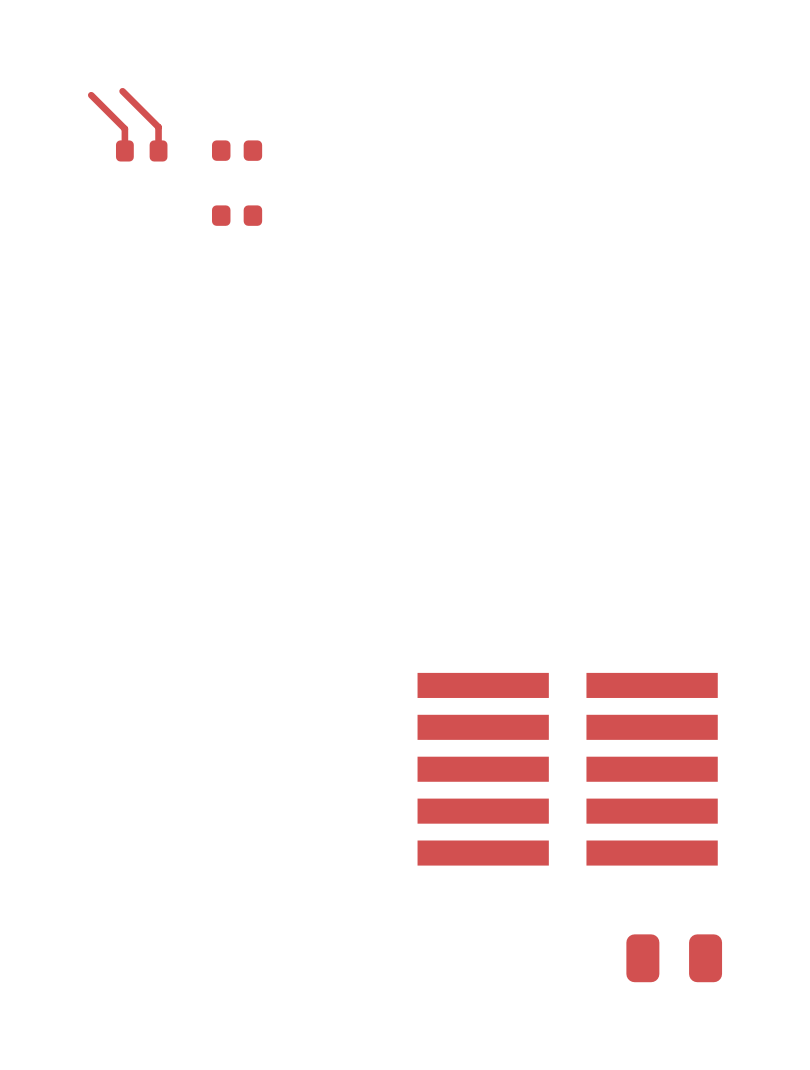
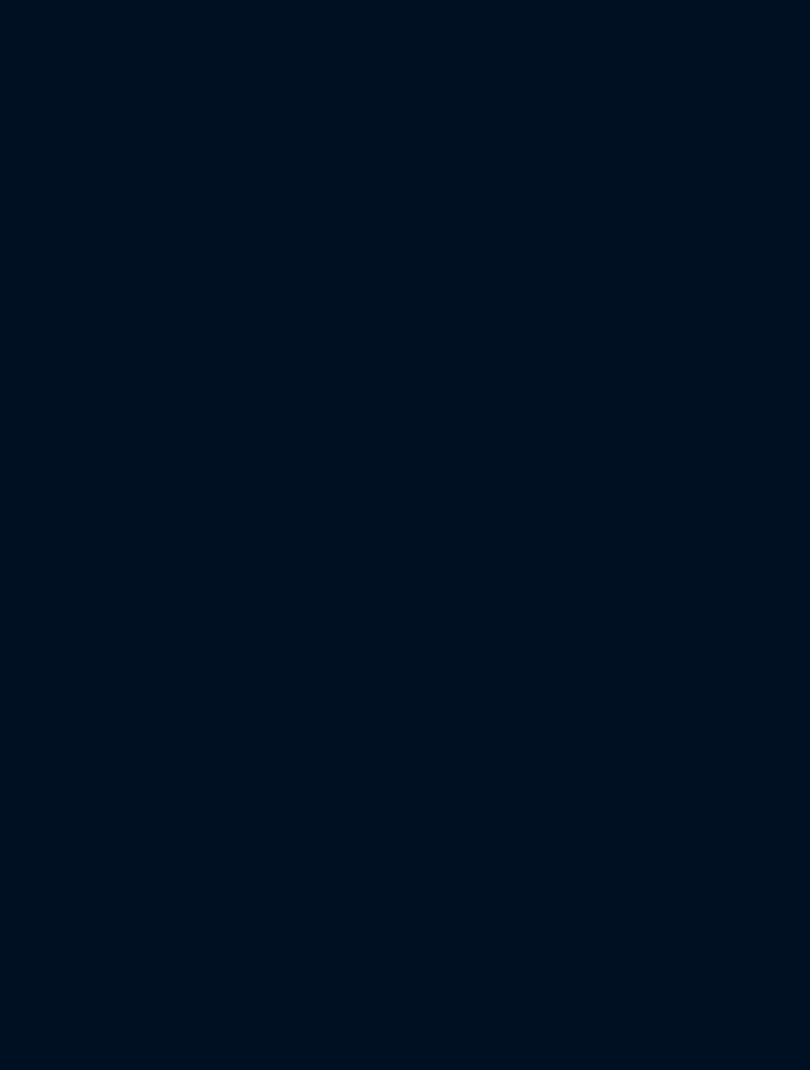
top track: (122, 91) (158, 127) (158, 150) -> none
top track: (91, 95) (124, 128) (124, 150) -> none
part: (141, 150) -> none
part: (237, 150) -> none
part: (237, 215) -> none
part: (567, 769) -> none
part: (674, 958) -> none

